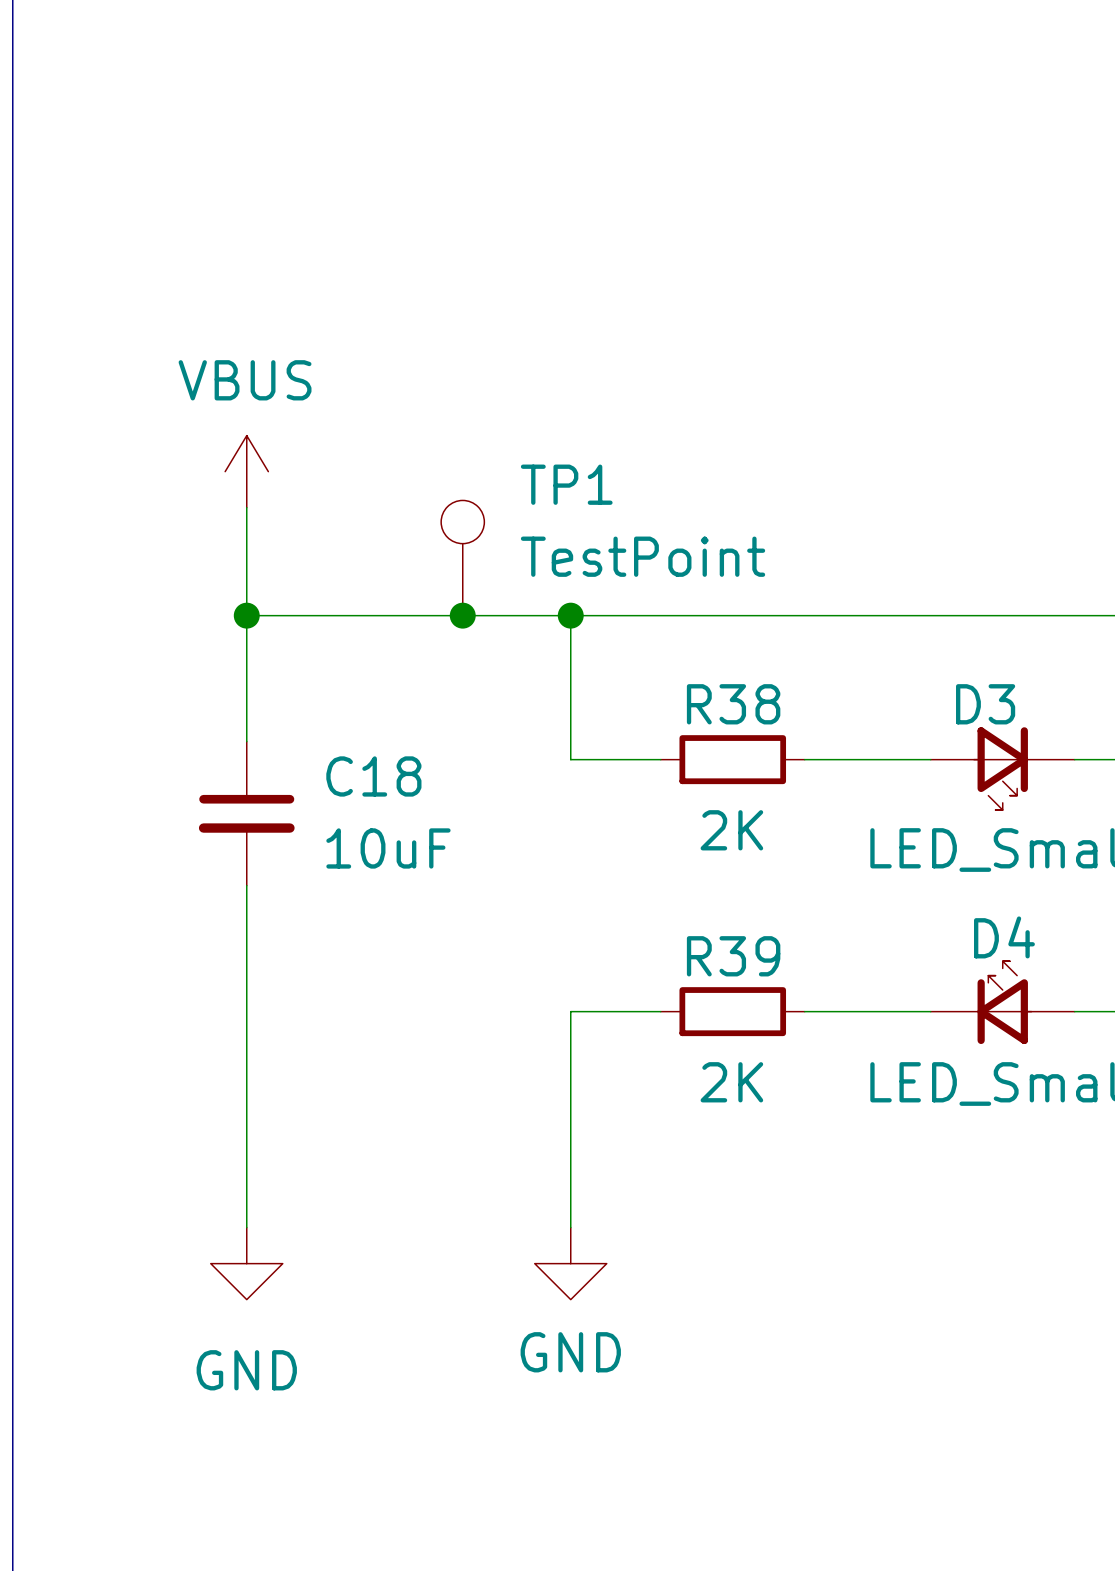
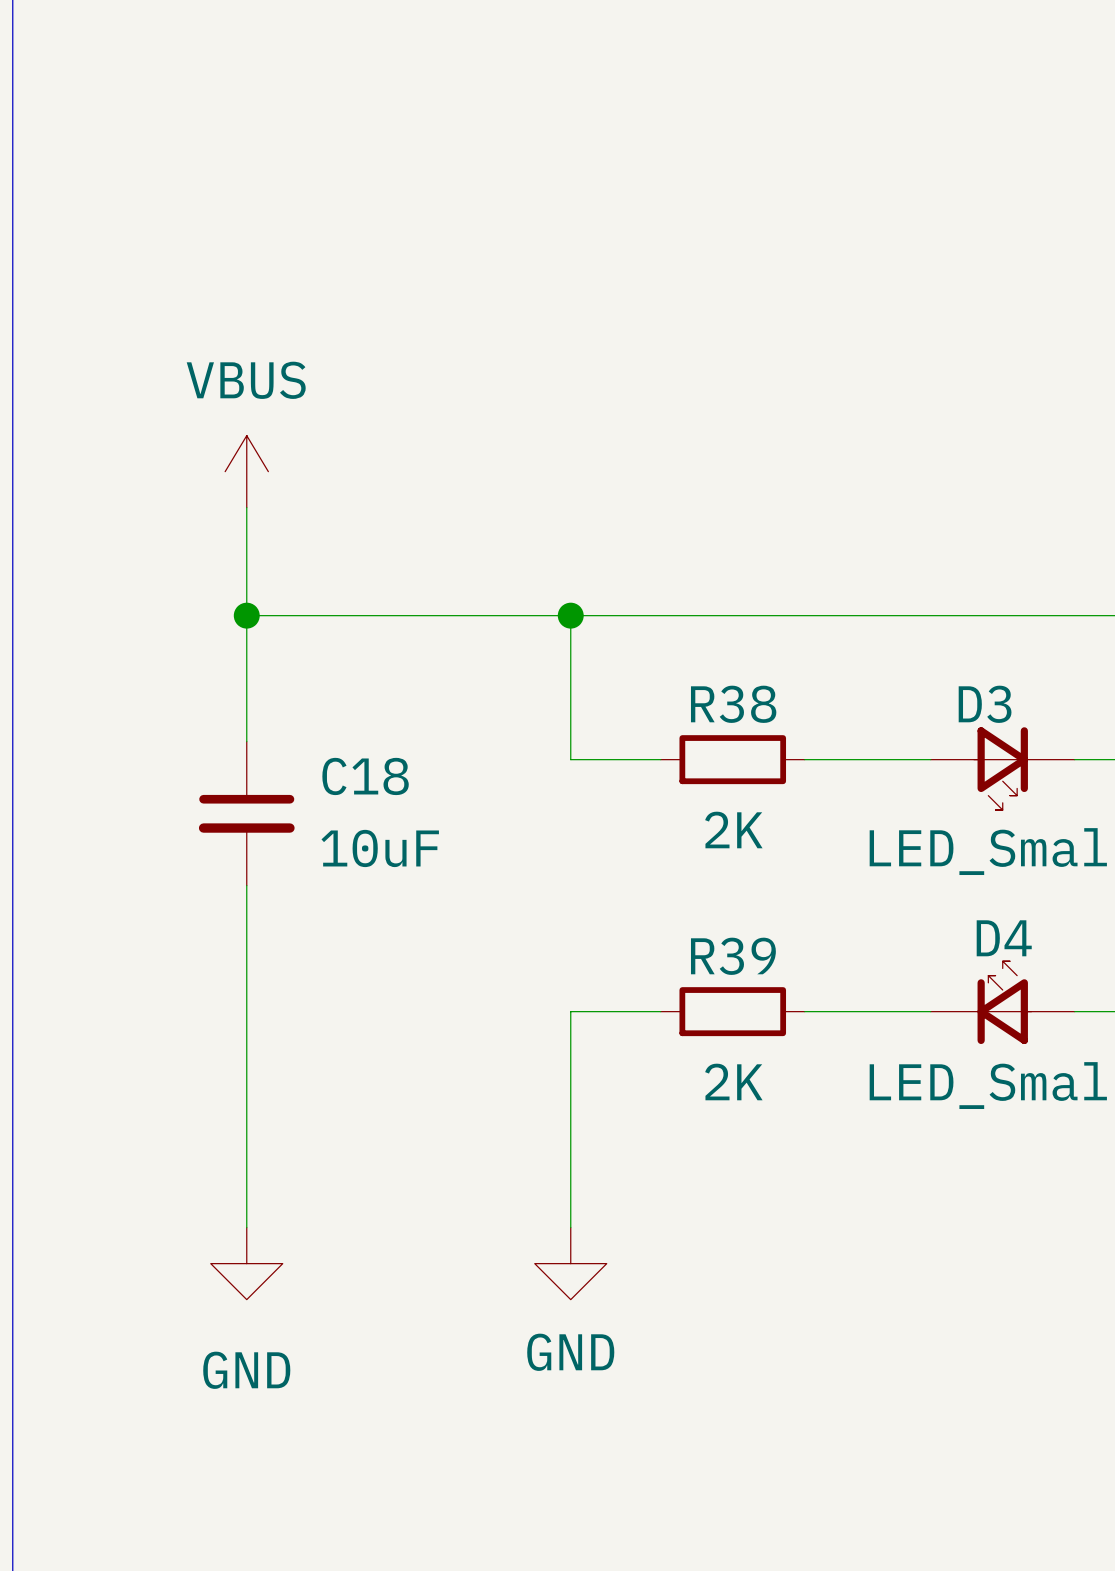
TP1: TestPoint (462, 558) -> none
junction: (462, 615) -> none

